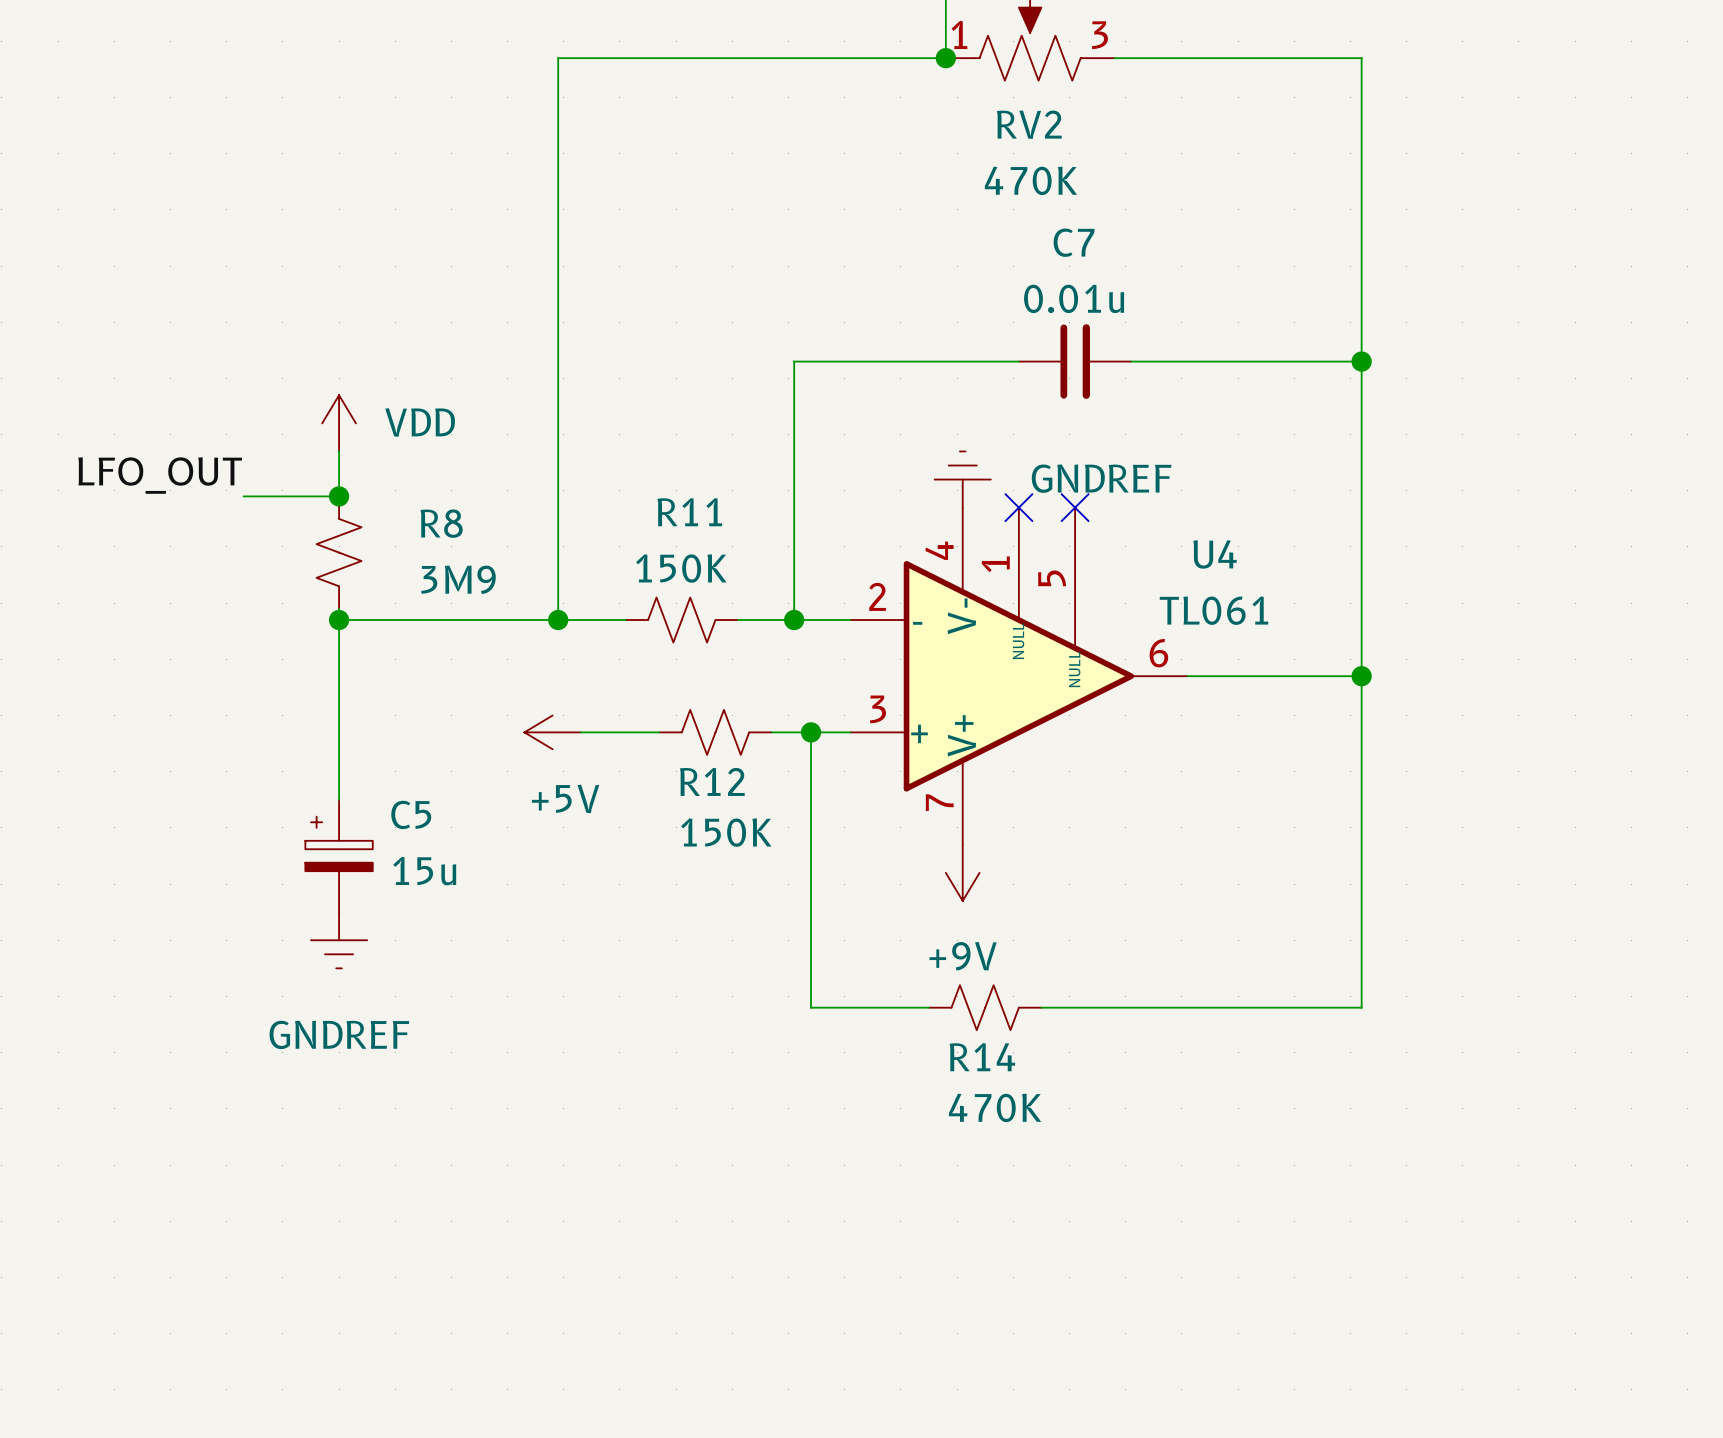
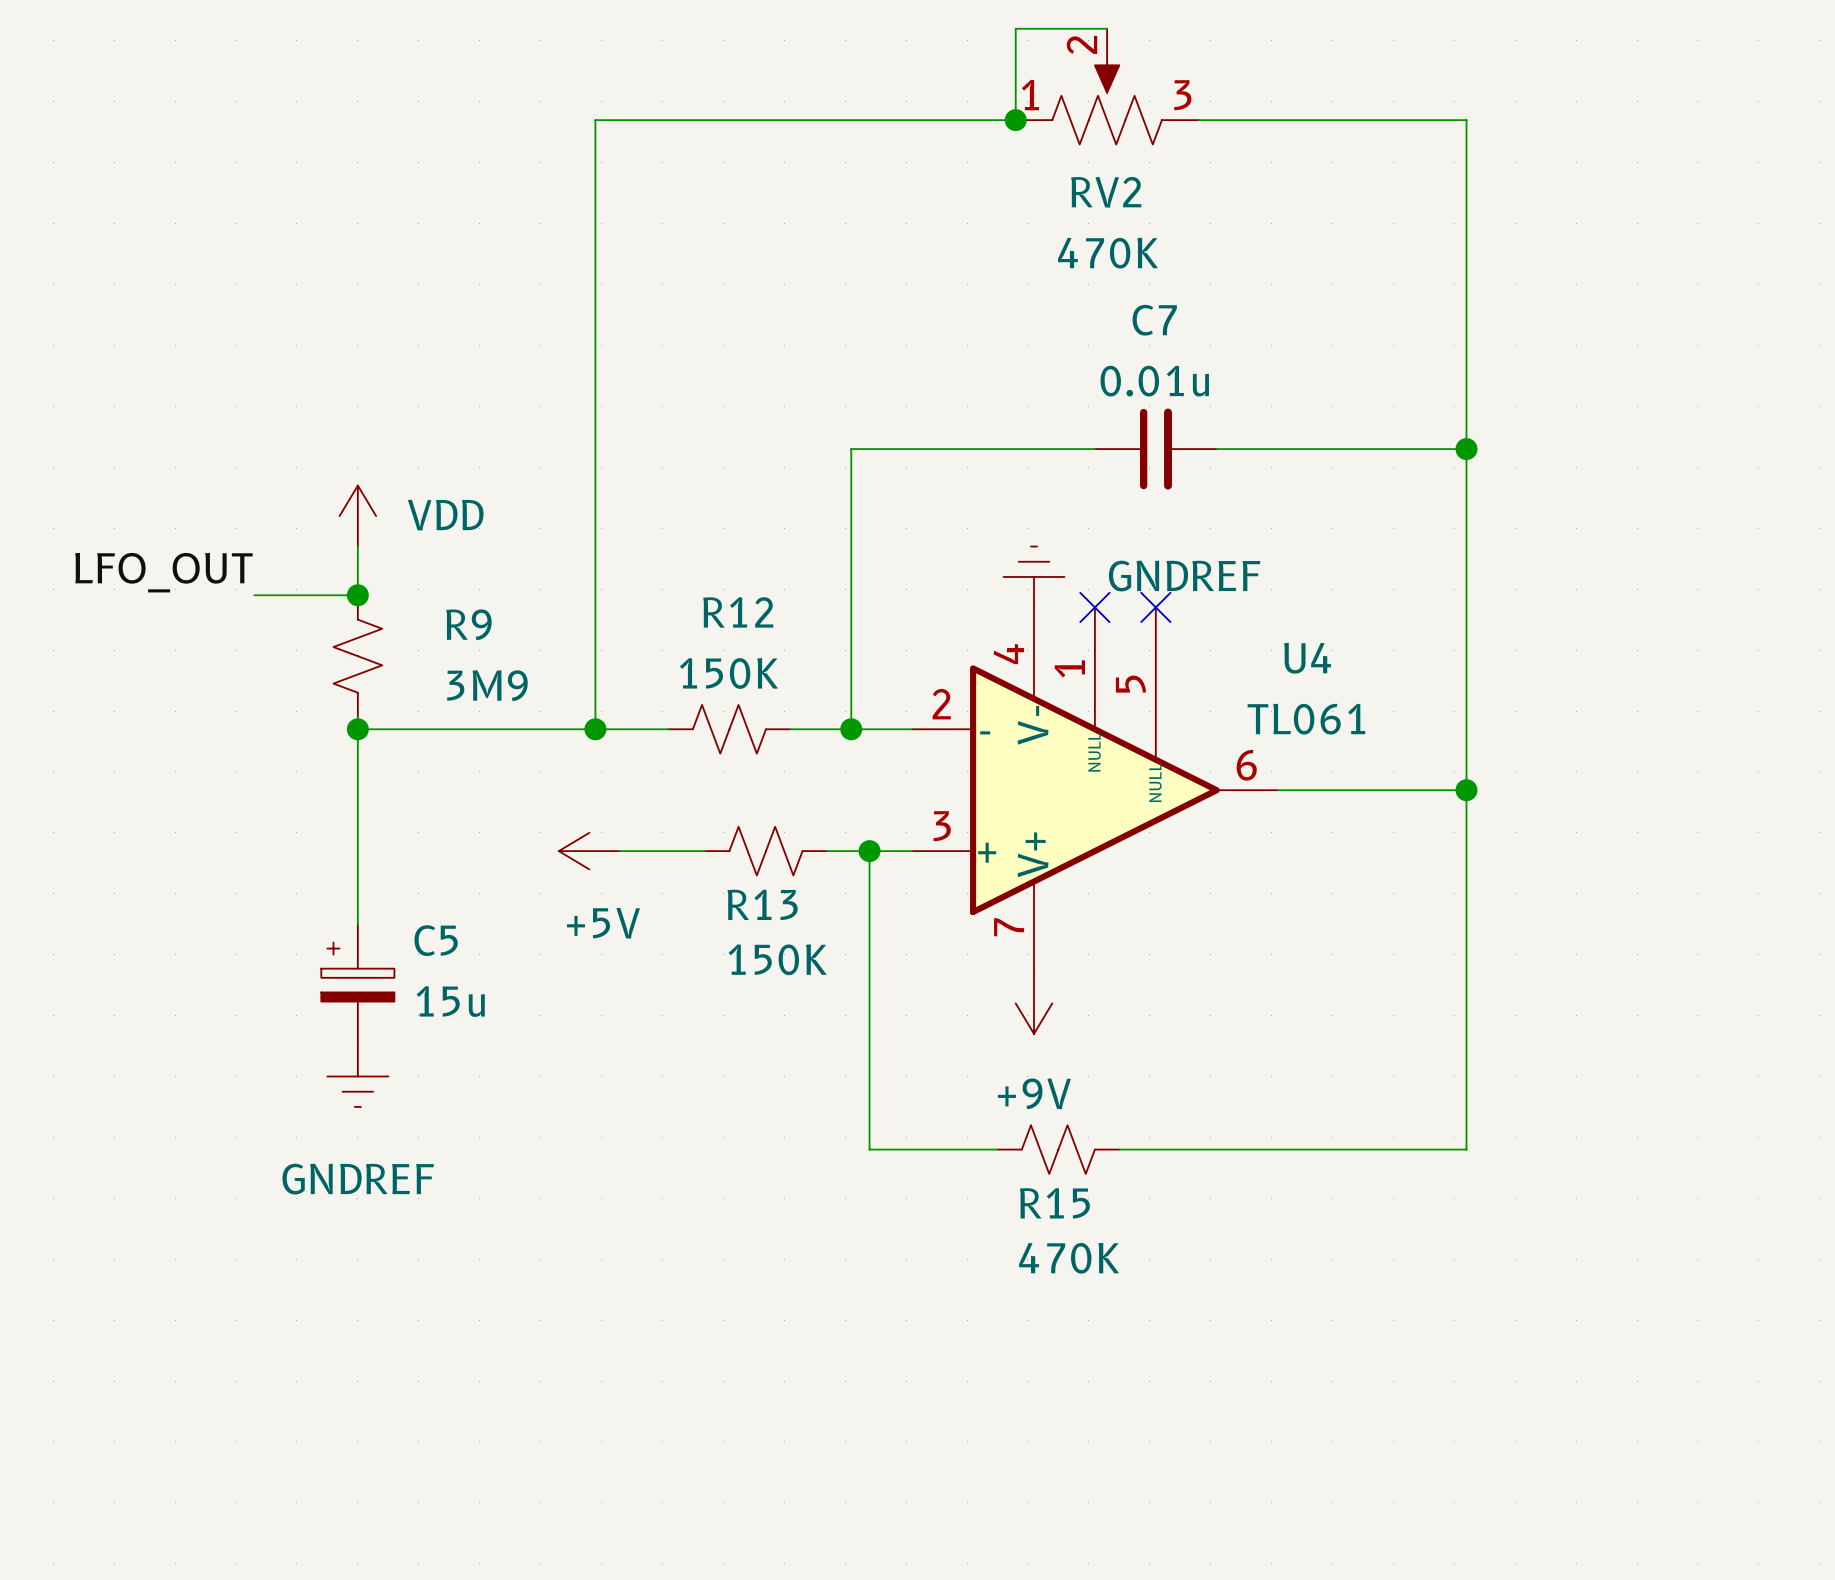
R11 name: R11 (689, 512) -> R12 (738, 612)
R8 name: R8 (441, 523) -> R9 (468, 624)
R12 name: R12 (712, 781) -> R13 (762, 904)
R14 name: R14 (982, 1057) -> R15 (1054, 1203)

